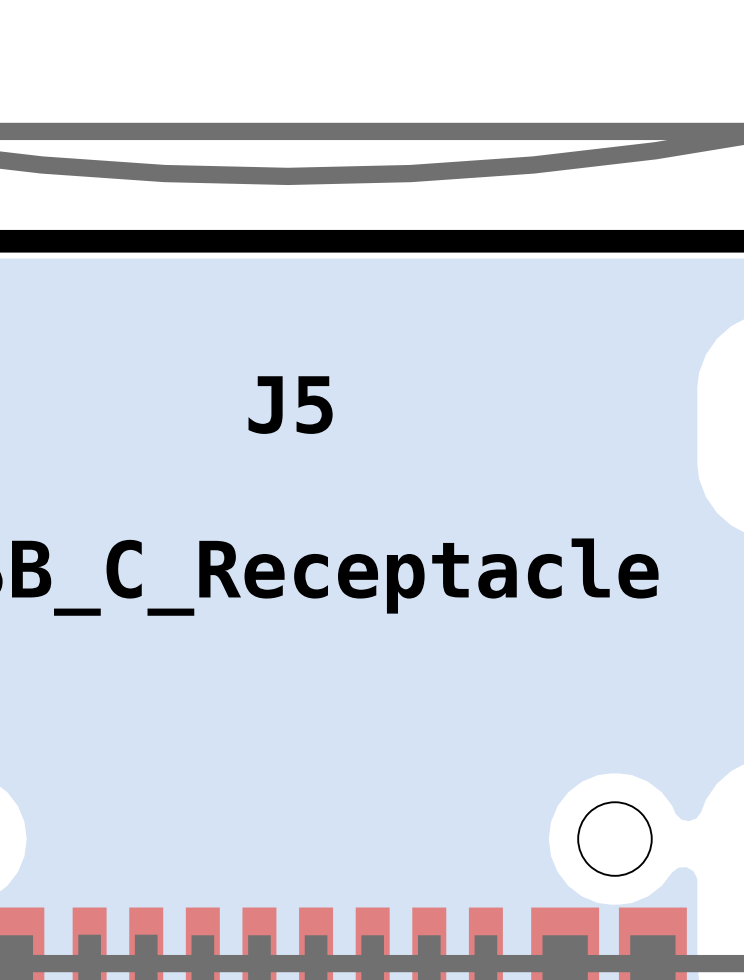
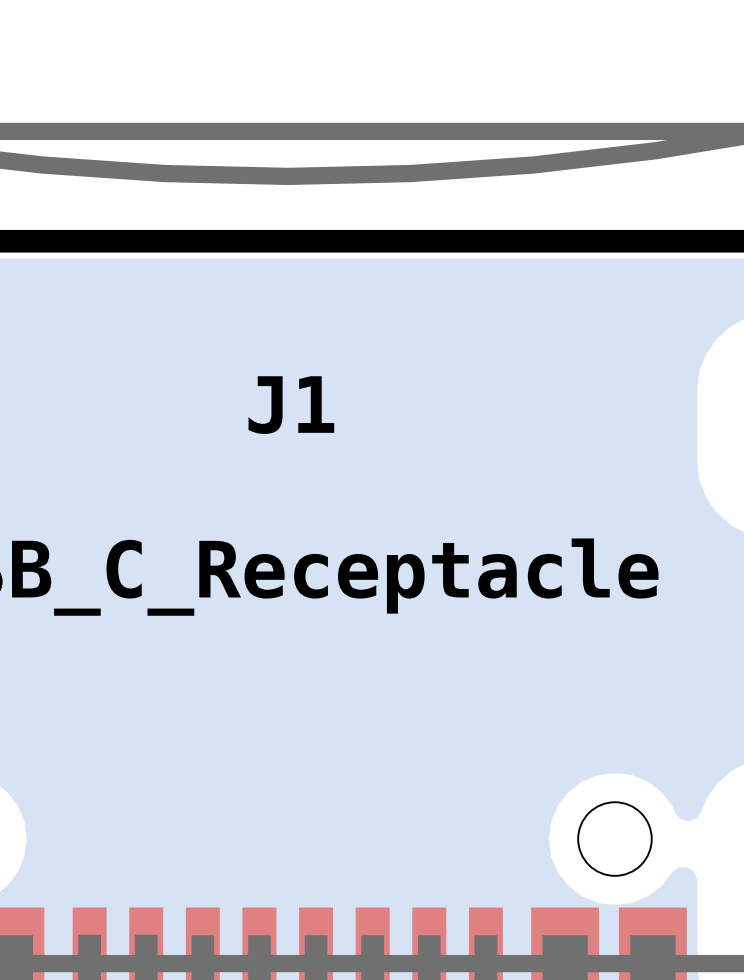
J5 name: J5 (290, 405) -> J1 (291, 405)

